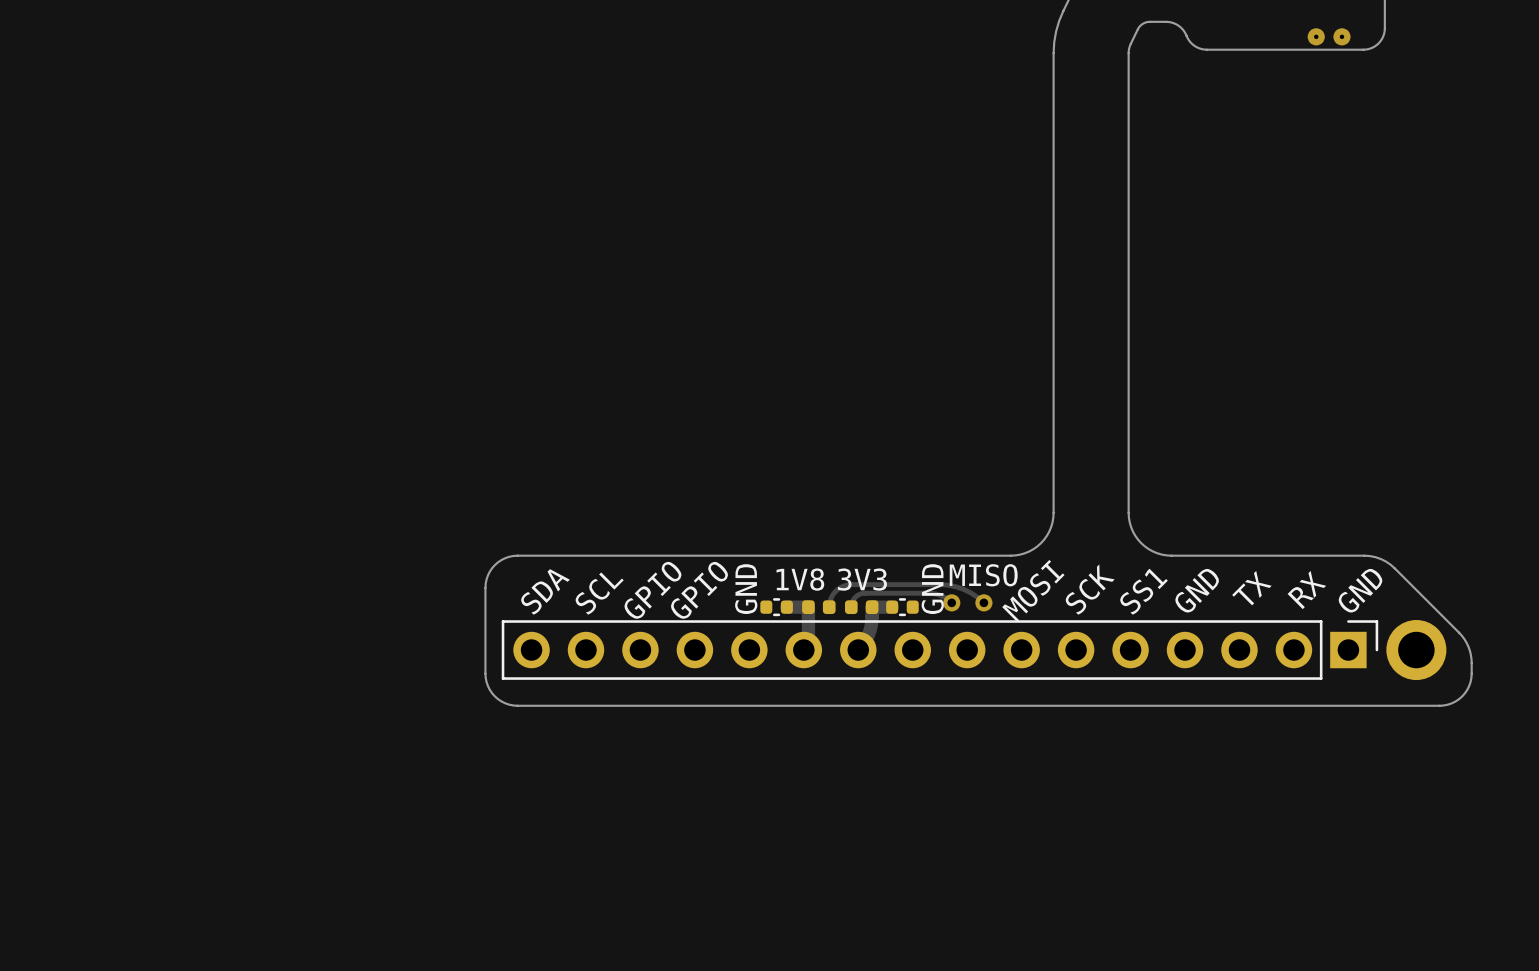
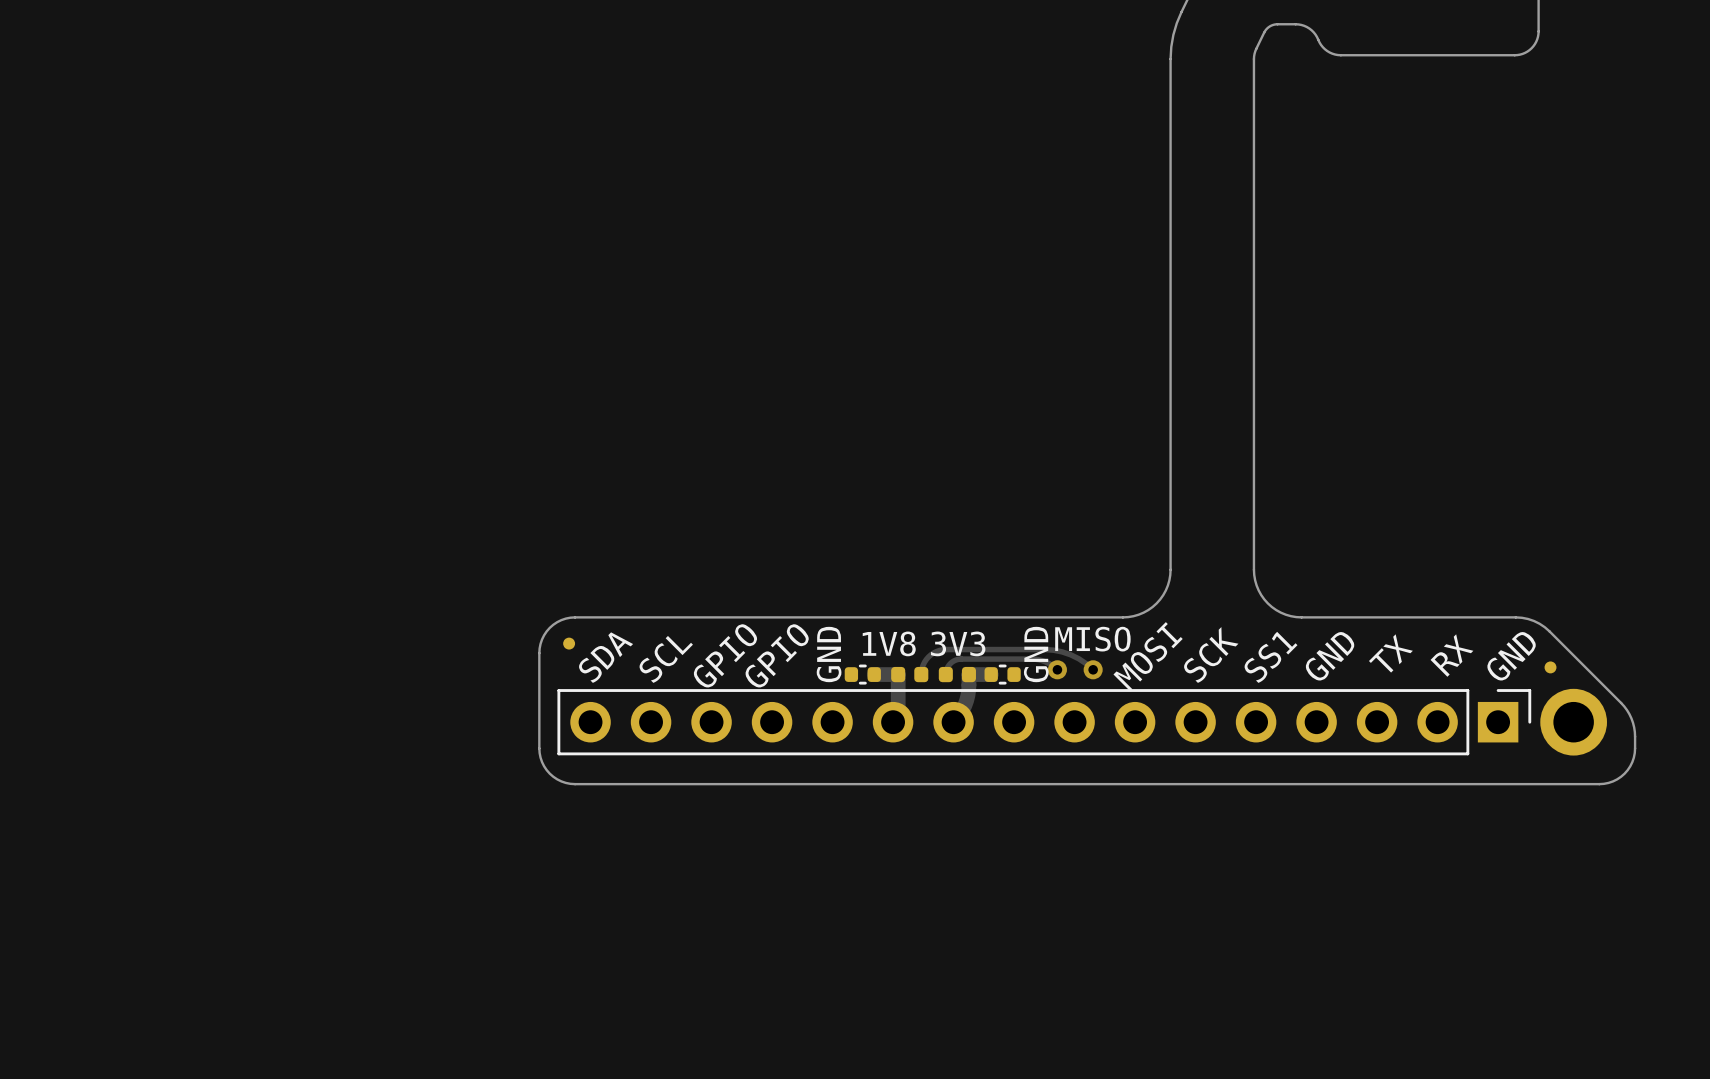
via: (1316, 36) -> none
via: (1341, 36) -> none
part: none -> (569, 643)
part: none -> (1550, 667)

